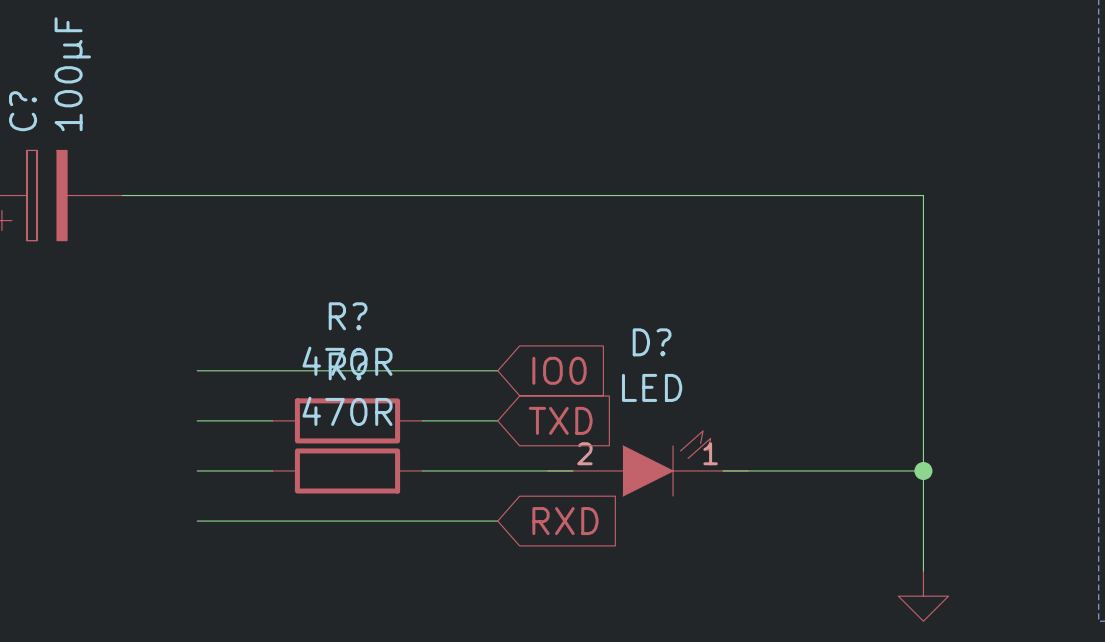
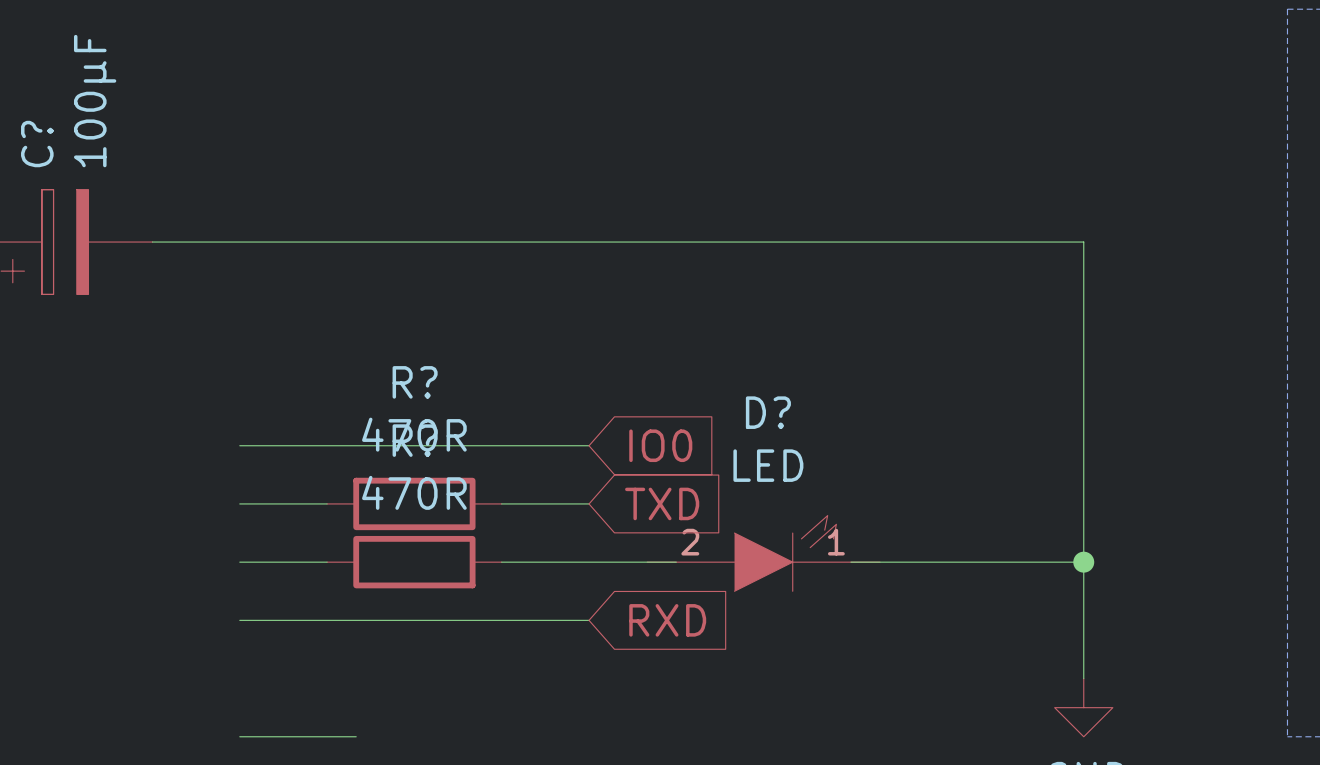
wire: none -> (239, 736) (356, 736)

